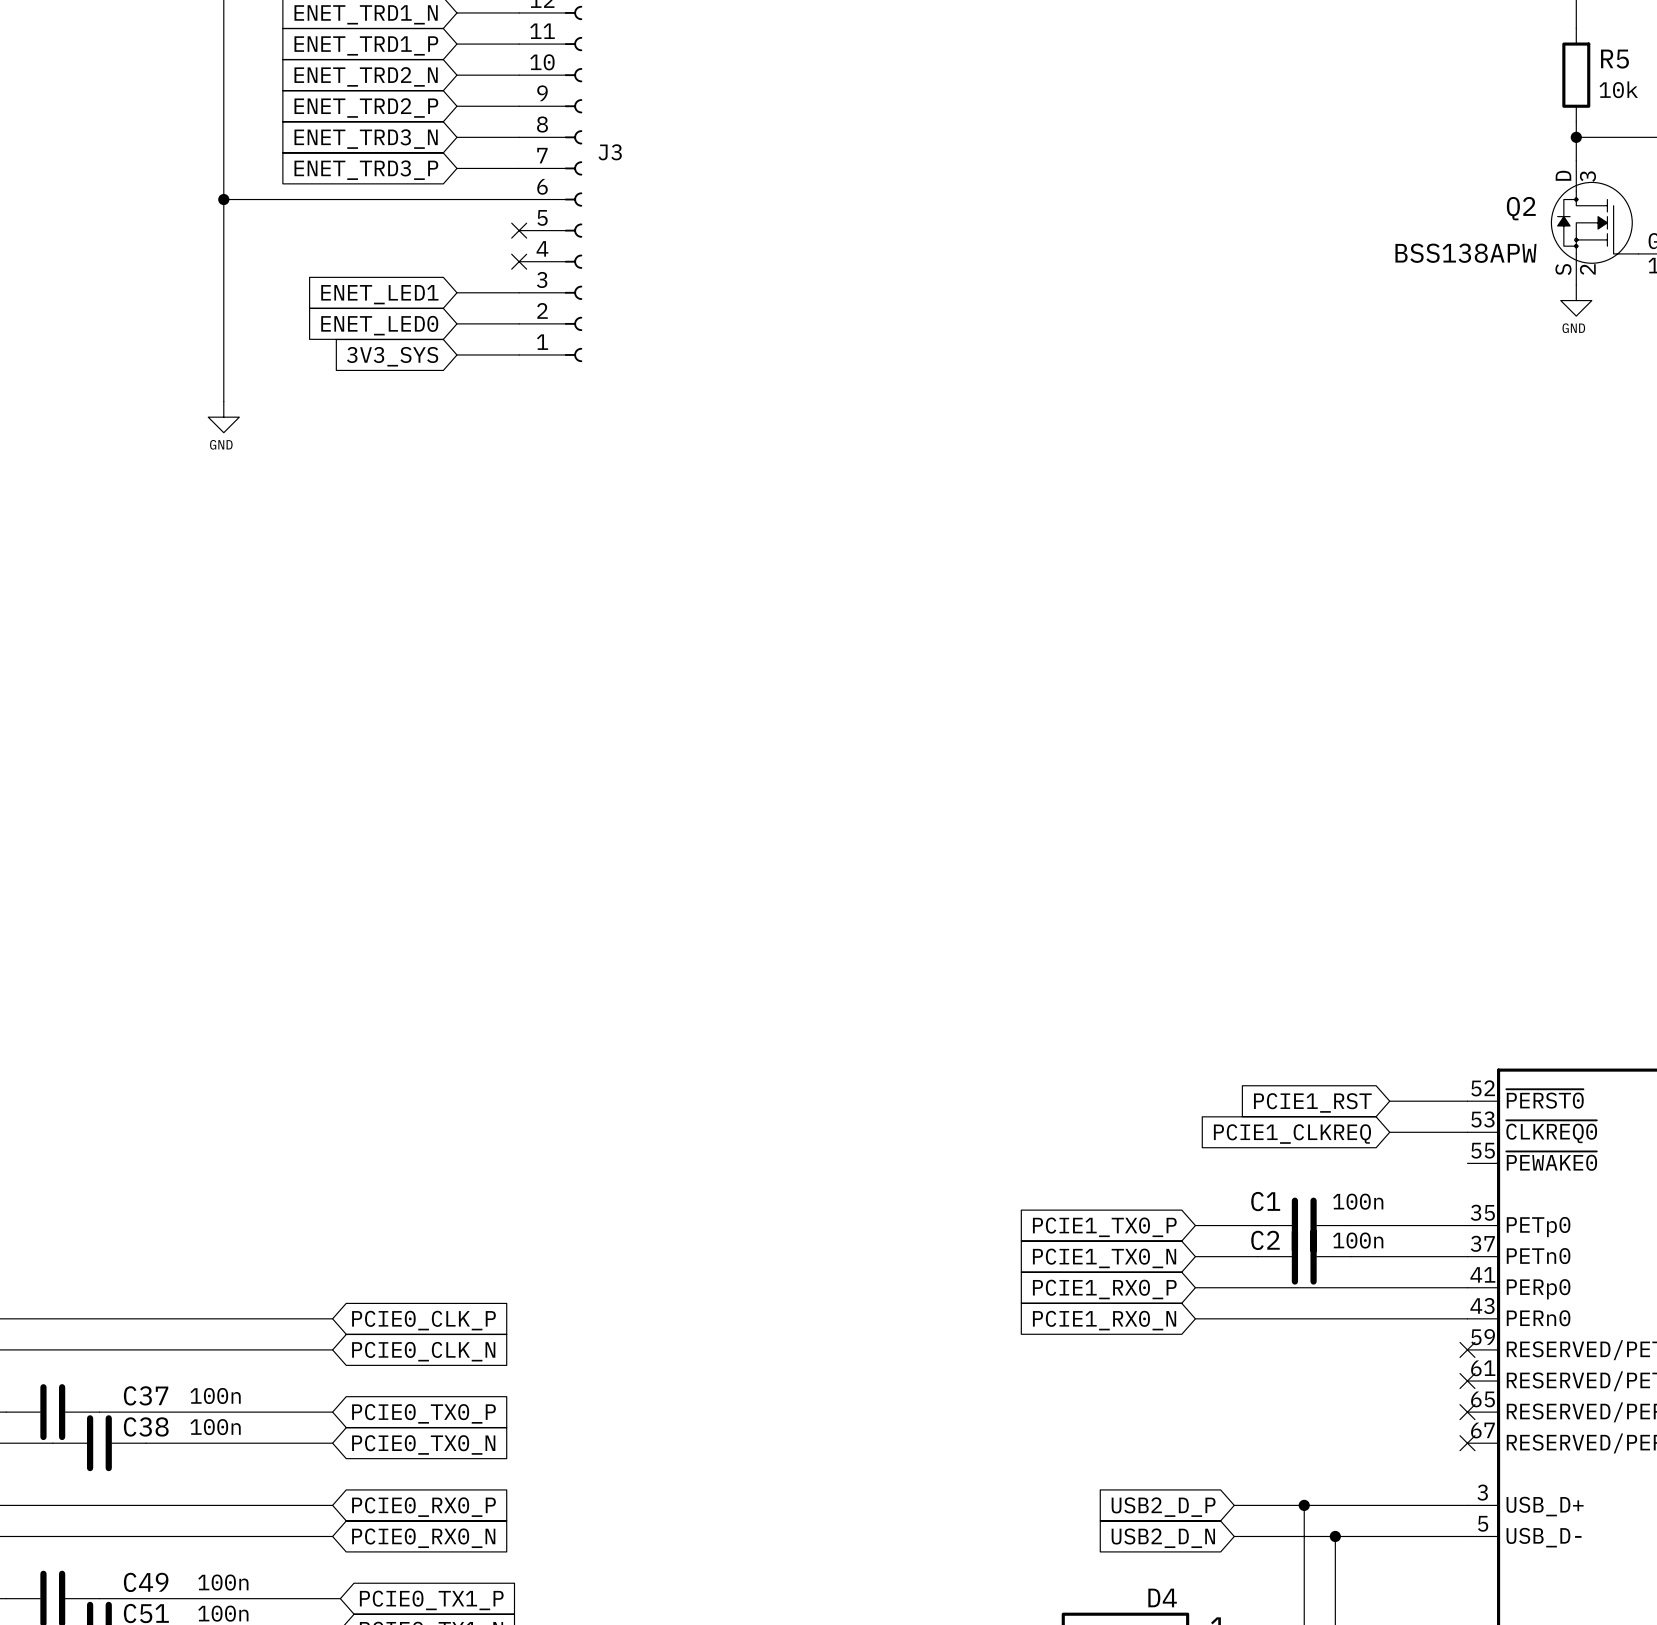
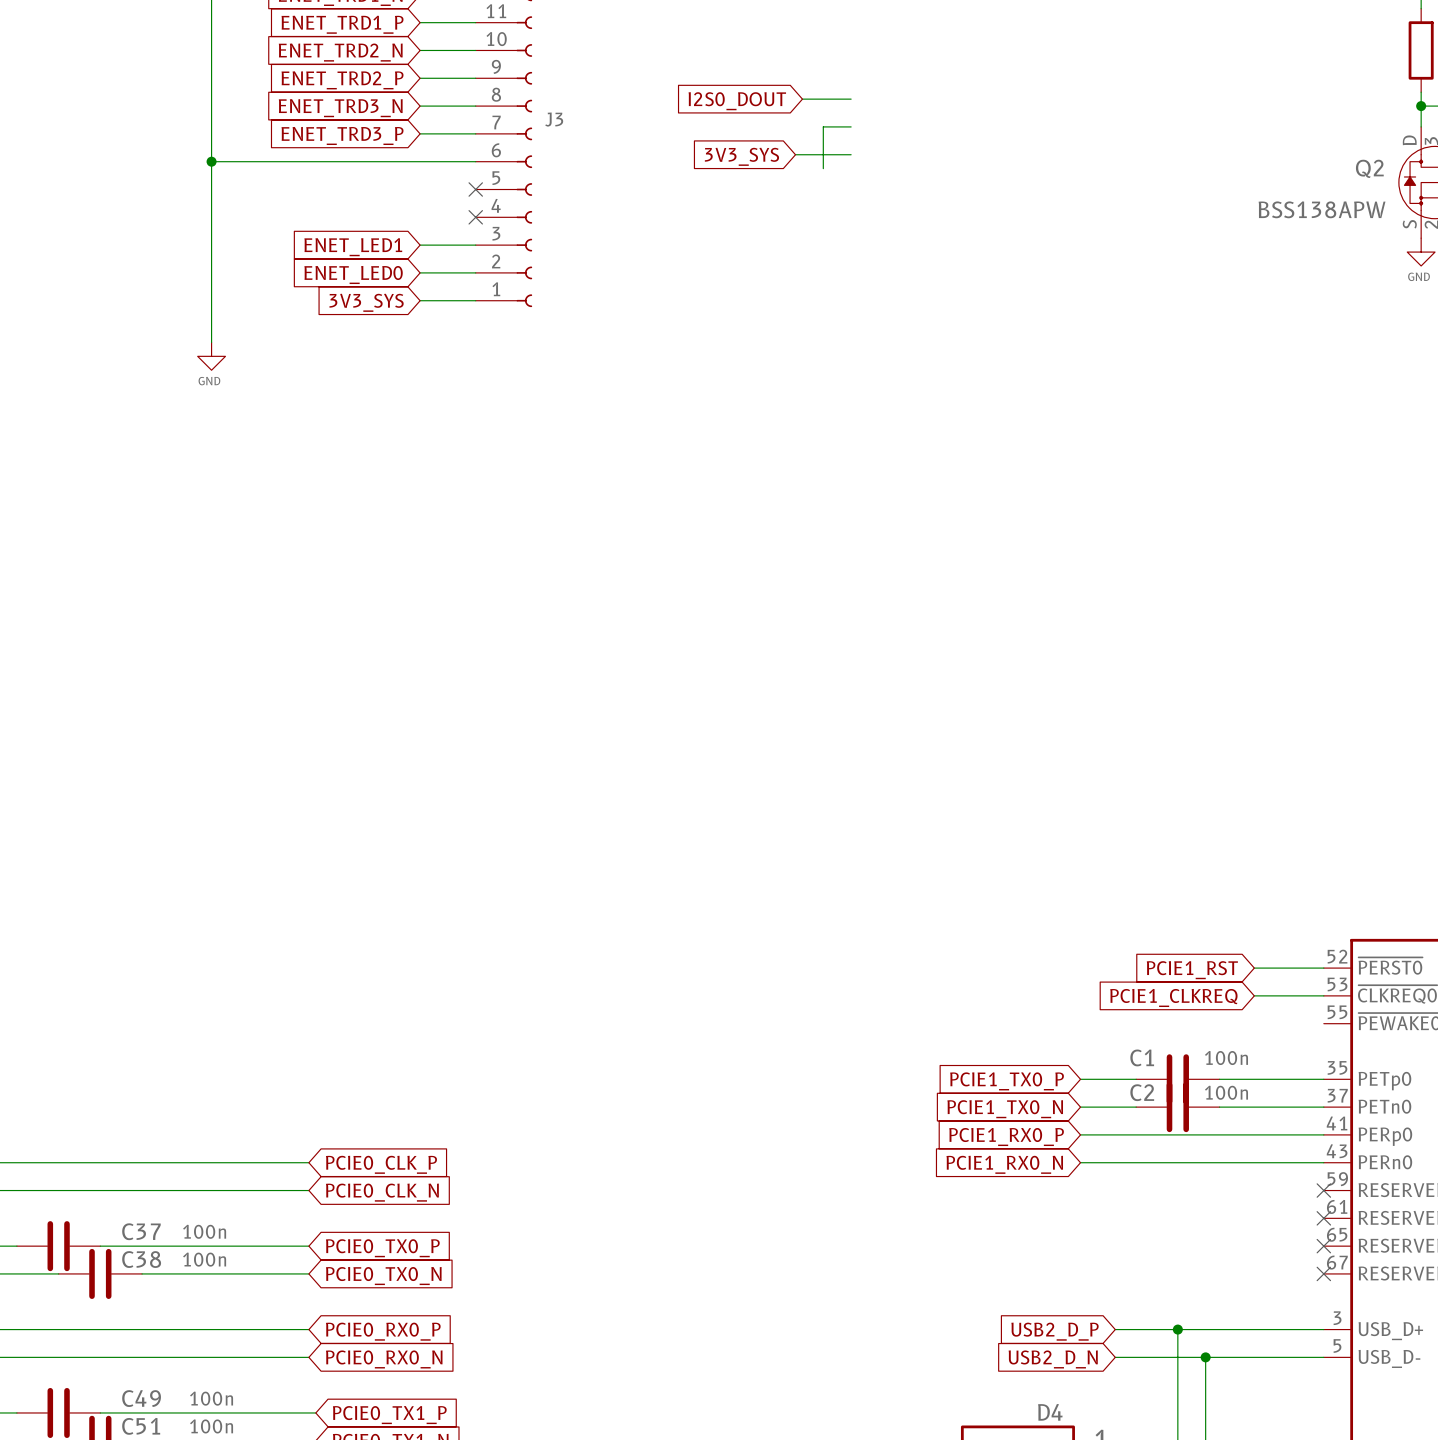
wire: none -> (802, 99) (851, 99)
global label: none -> I2S0_DOUT (737, 101)
wire: none -> (851, 126) (823, 126) (823, 168)
wire: none -> (795, 154) (851, 154)
global label: none -> 3V3_SYS (741, 156)

